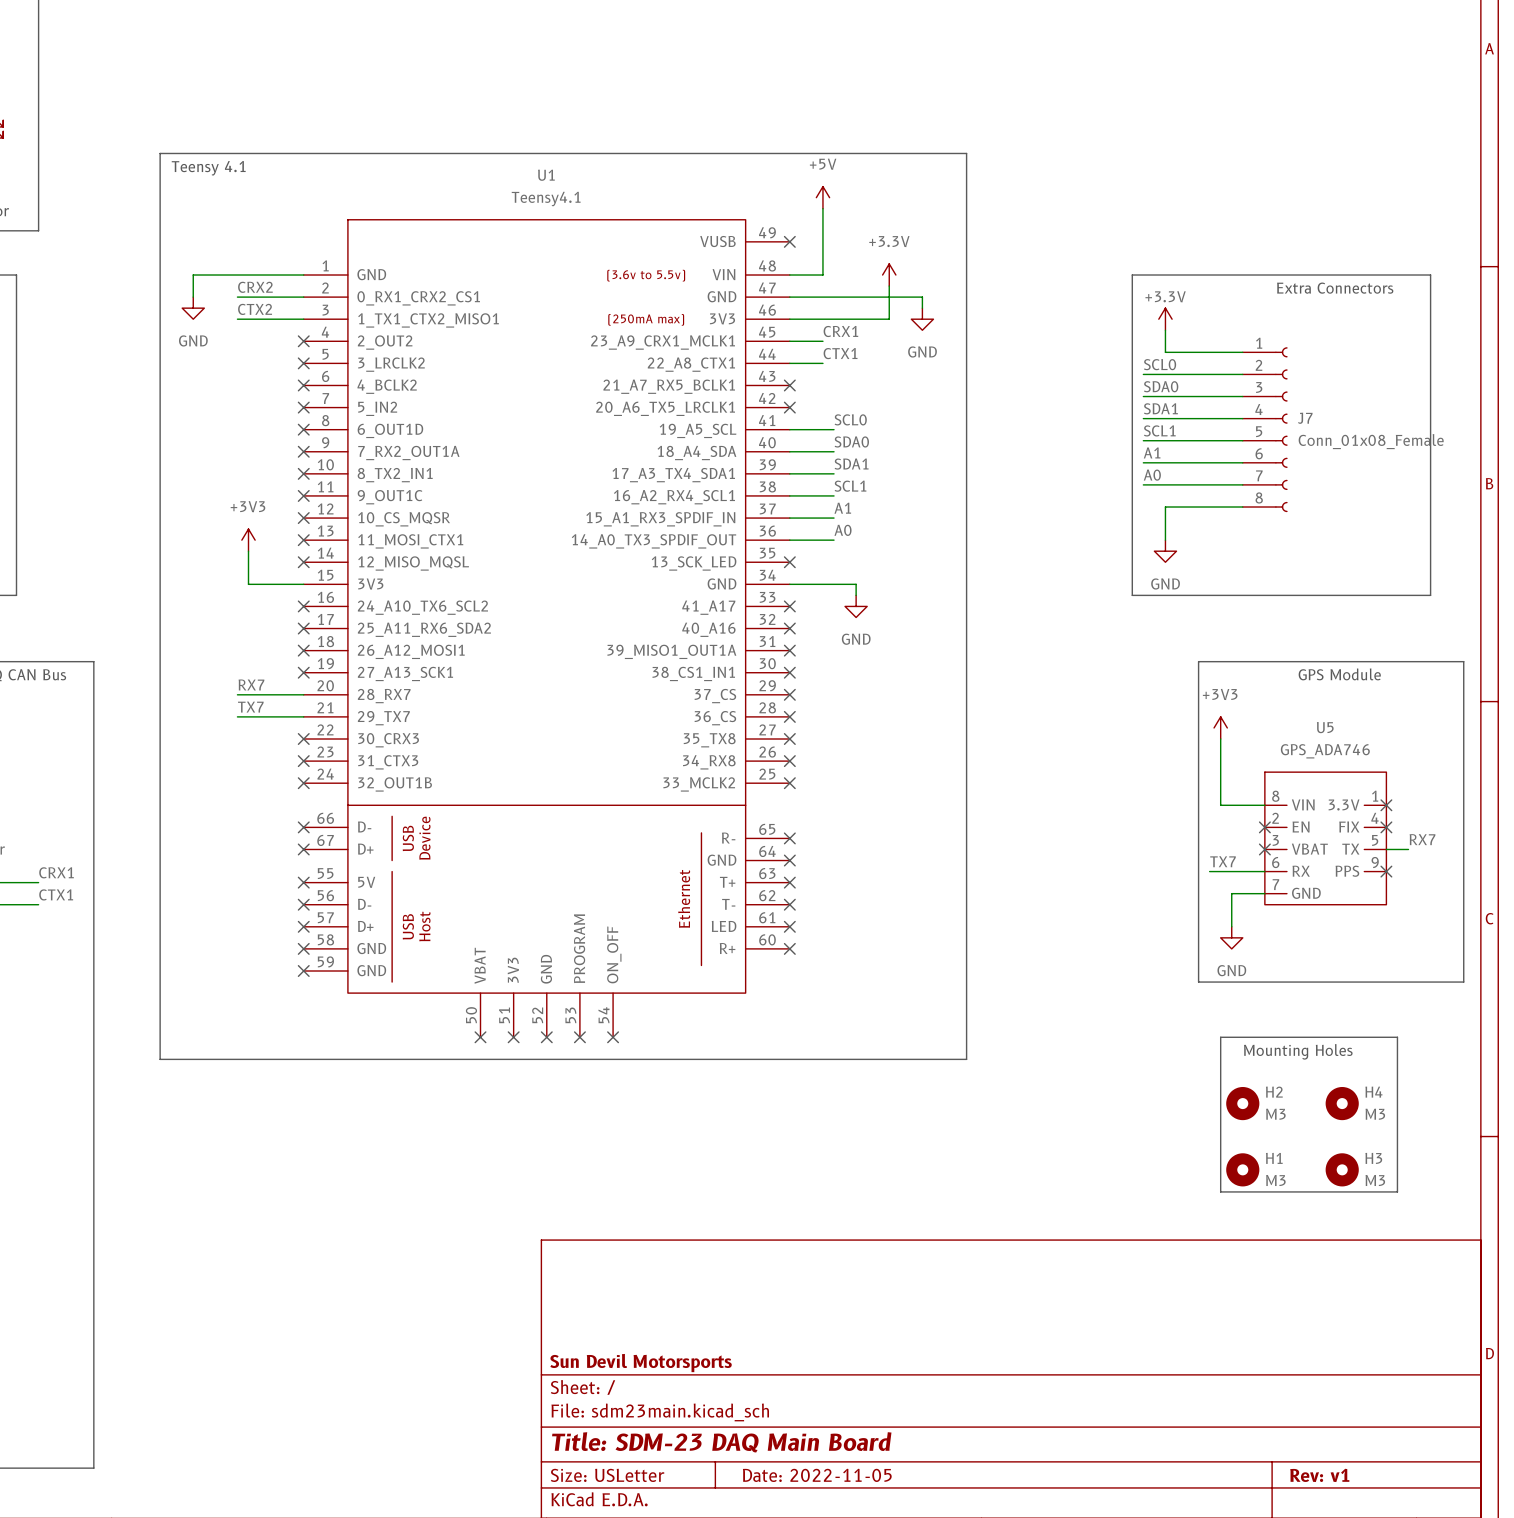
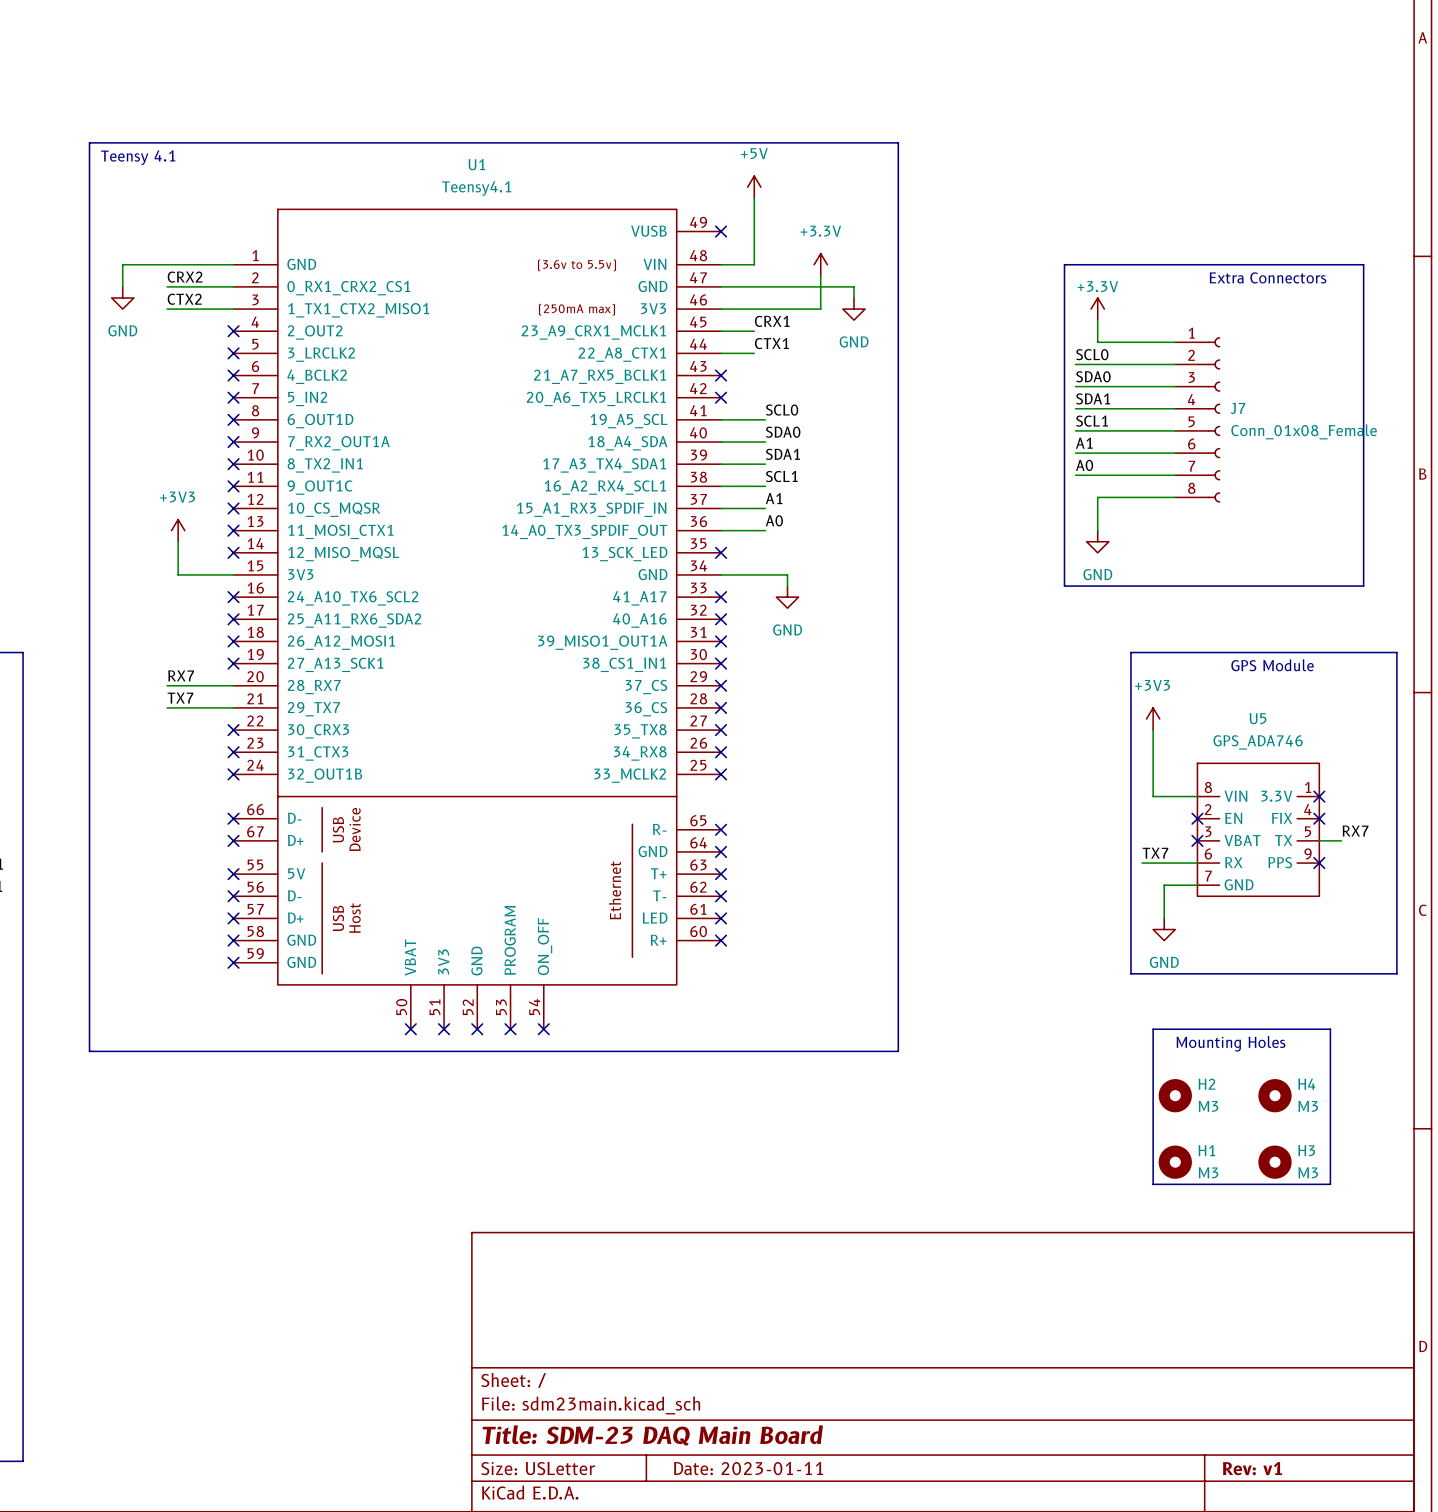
title block: Sun Devil Motorsports (641, 1363) -> none
title block: Date: 2022-11-05 (817, 1475) -> Date: 2023-01-11 (748, 1468)

